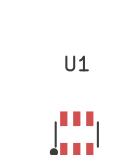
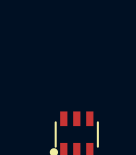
U1 name: U1 (77, 63) -> none

